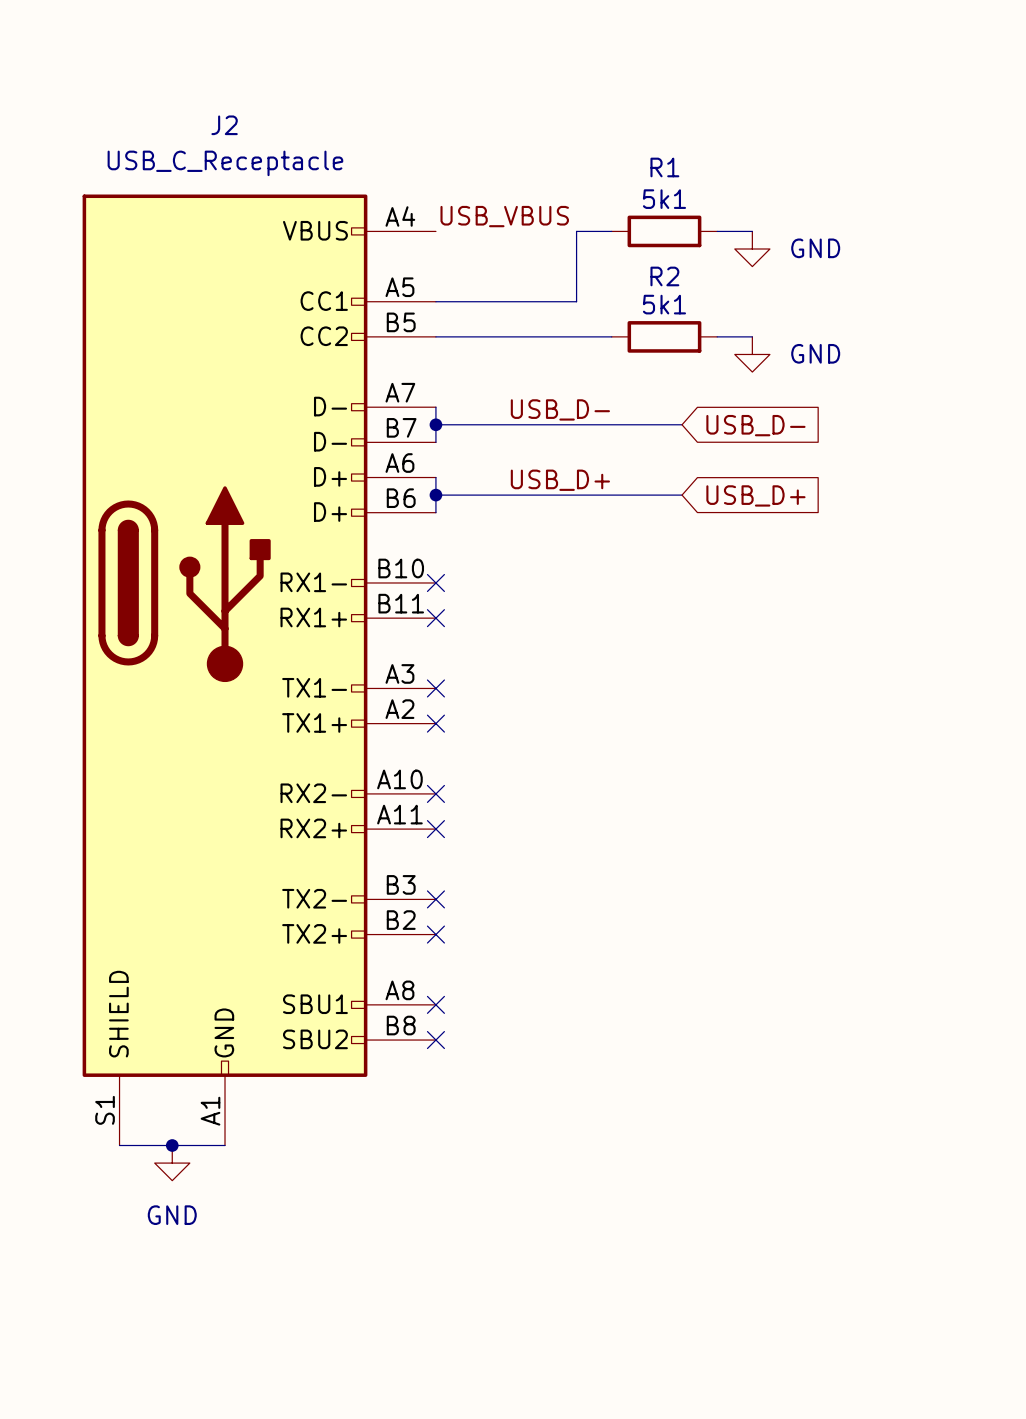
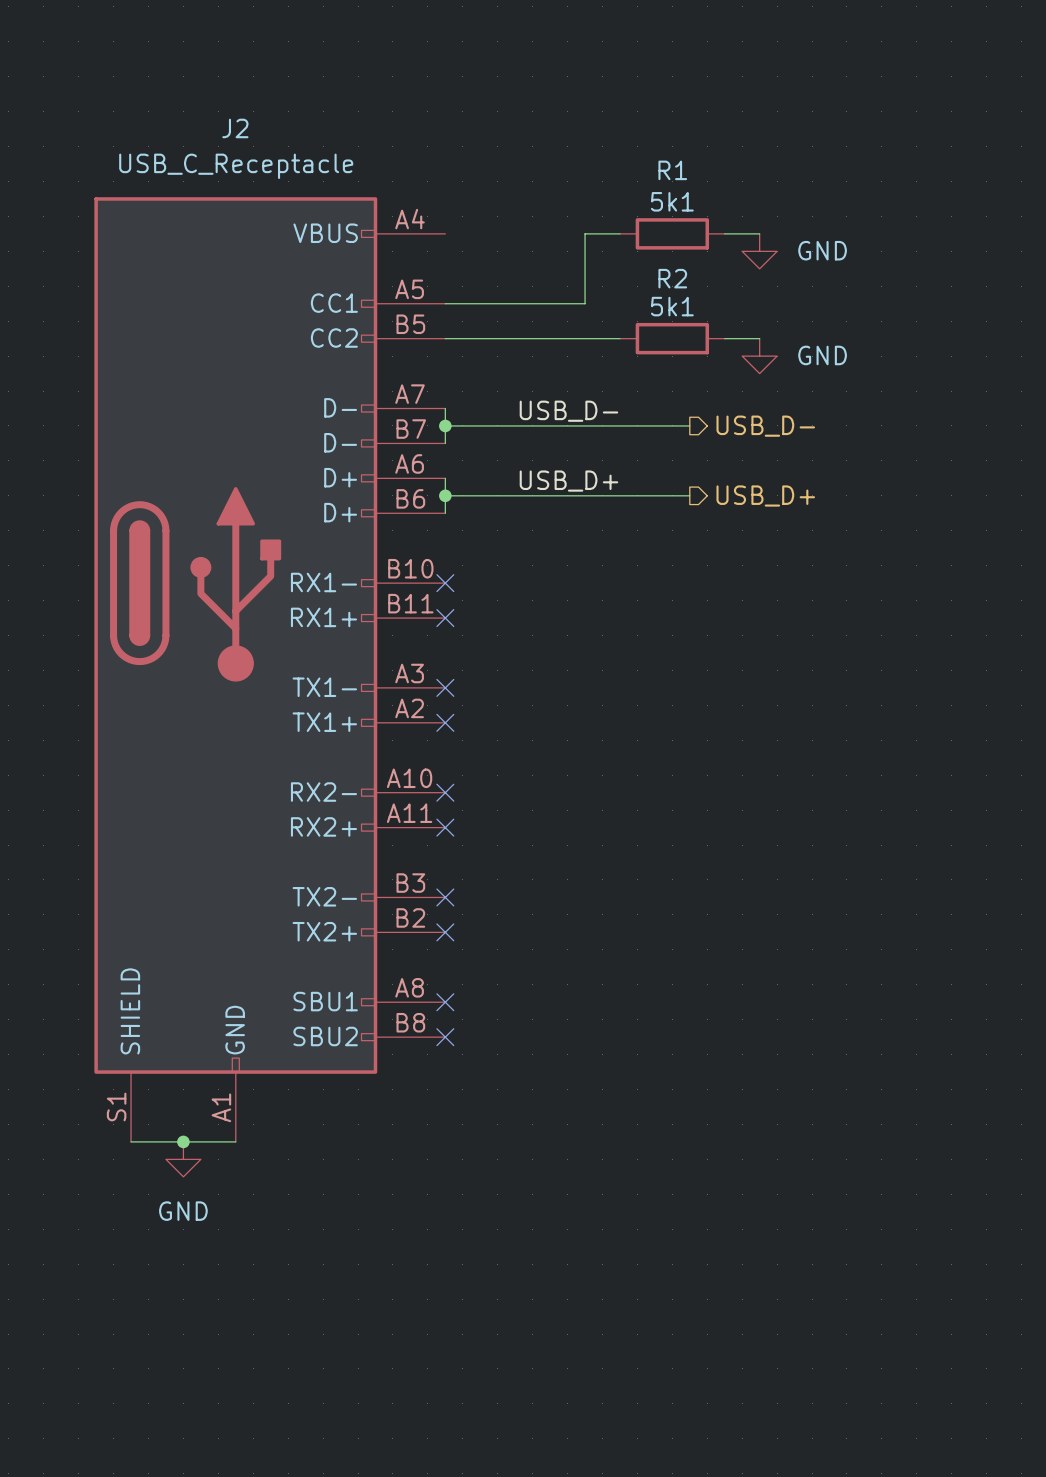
label: USB_VBUS (504, 216) -> none
hierarchical label: none -> USB_D- (765, 426)
global label: USB_D- (755, 425) -> none
global label: USB_D+ (755, 495) -> none
hierarchical label: none -> USB_D+ (765, 496)

